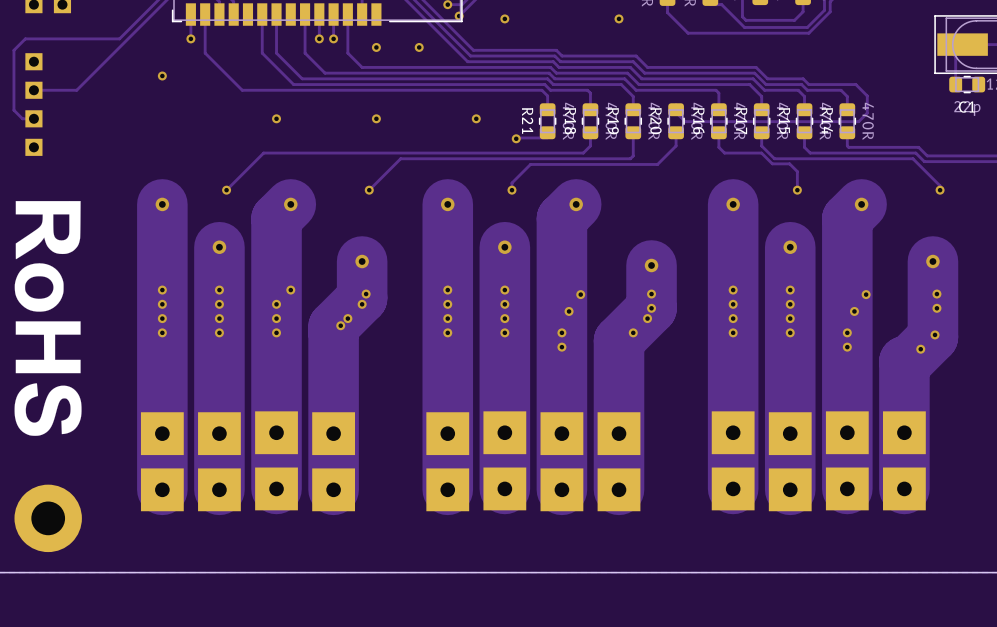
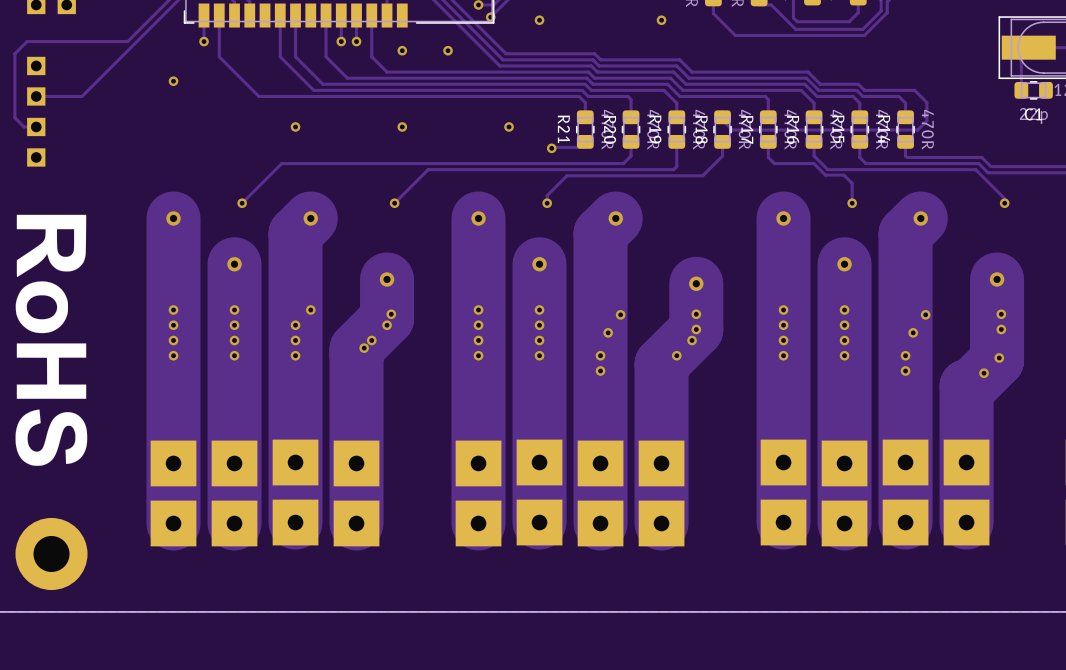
R18 name position: R18 (570, 121) -> R18 (701, 129)
R20 name position: R20 (655, 121) -> R20 (610, 129)
R16 name position: R16 (698, 121) -> R16 (793, 129)
R17 name position: R17 (741, 121) -> R17 (747, 129)

